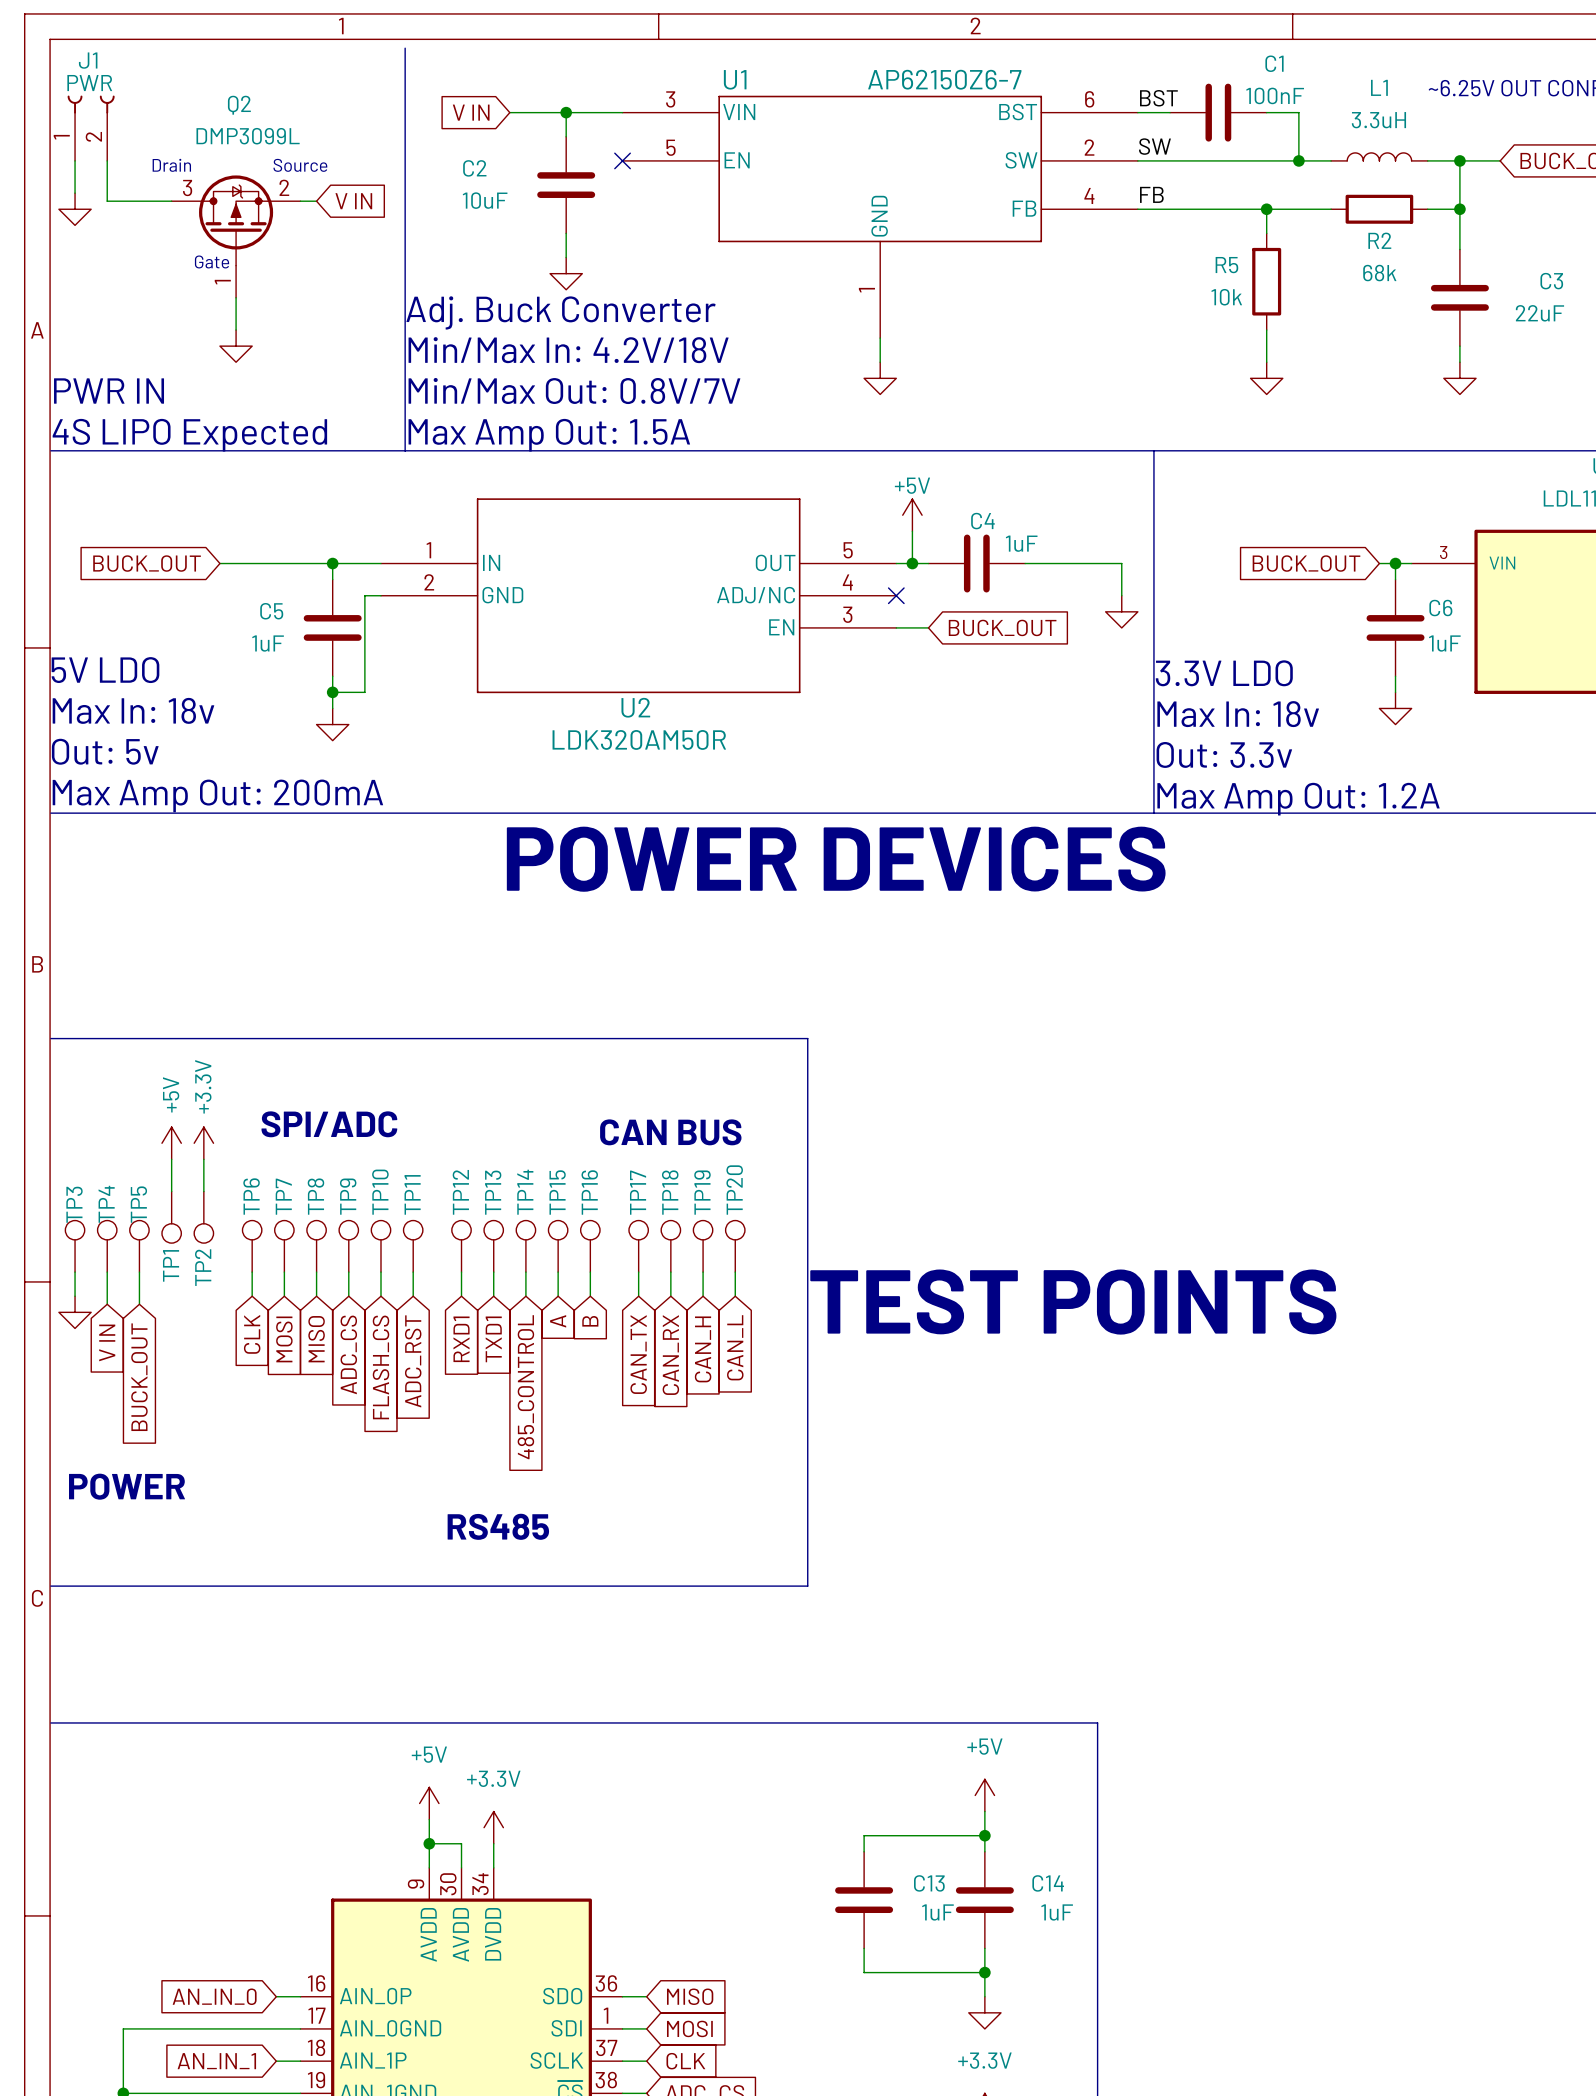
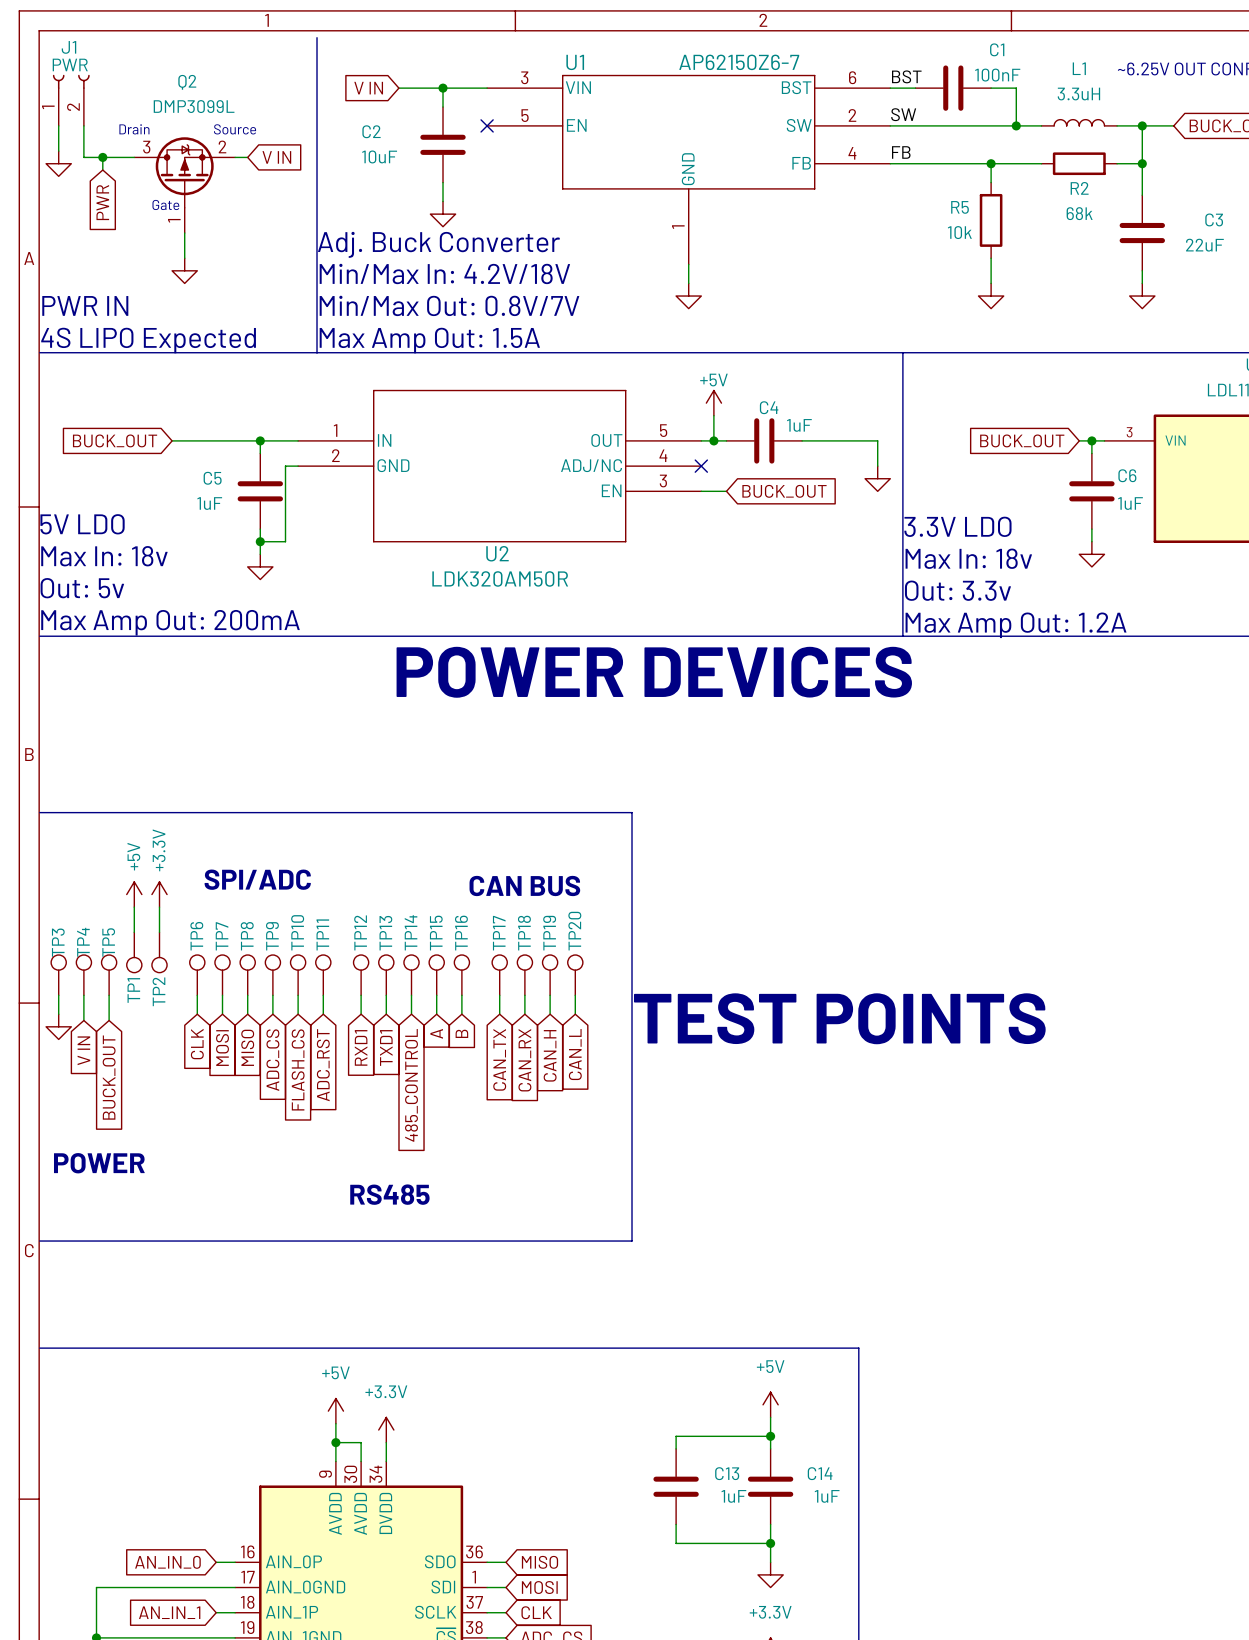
wire: none -> (102, 157) (102, 170)
junction: none -> (102, 157)
global label: none -> PWR (102, 202)

